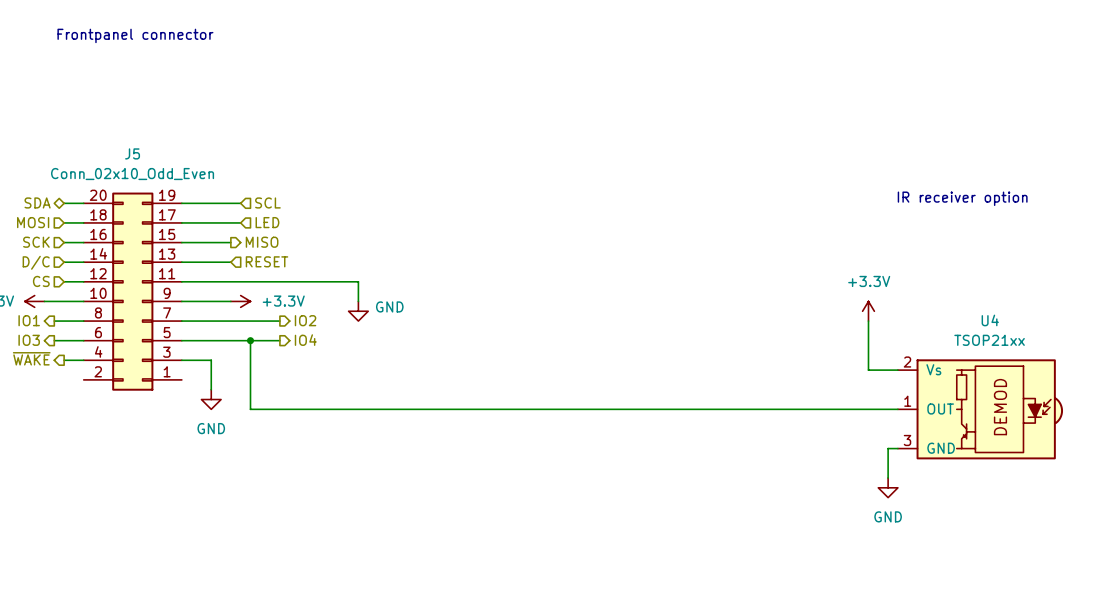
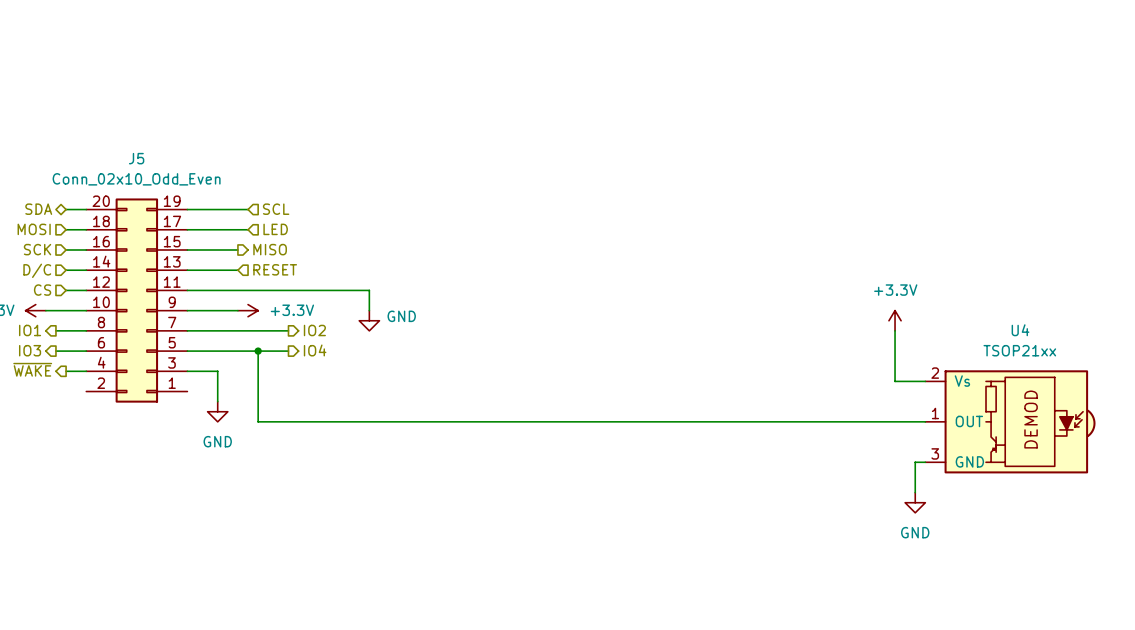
text: Frontpanel connector (135, 35) -> none
text: IR receiver option (962, 198) -> none

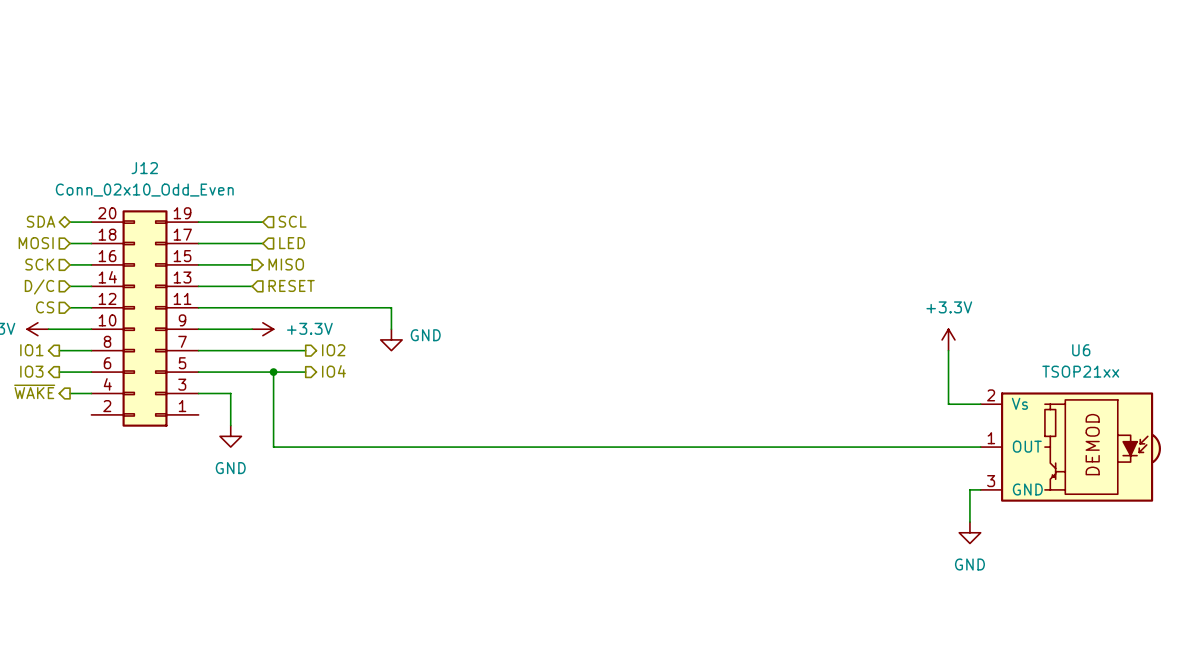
J5 name: J5 (136, 158) -> J12 (144, 168)
U4 name: U4 (1020, 330) -> U6 (1081, 350)

